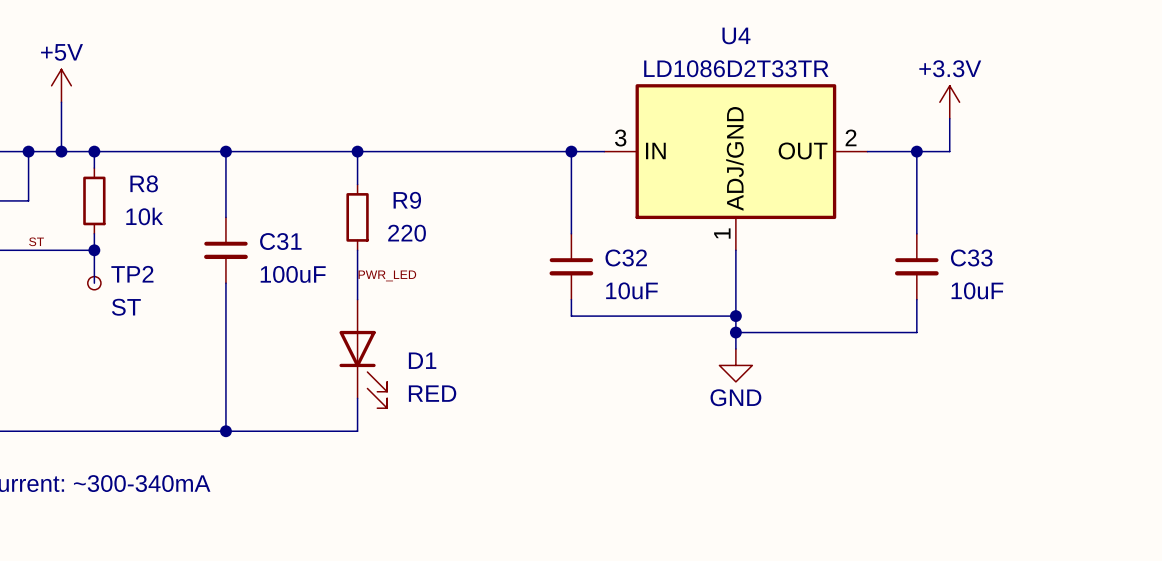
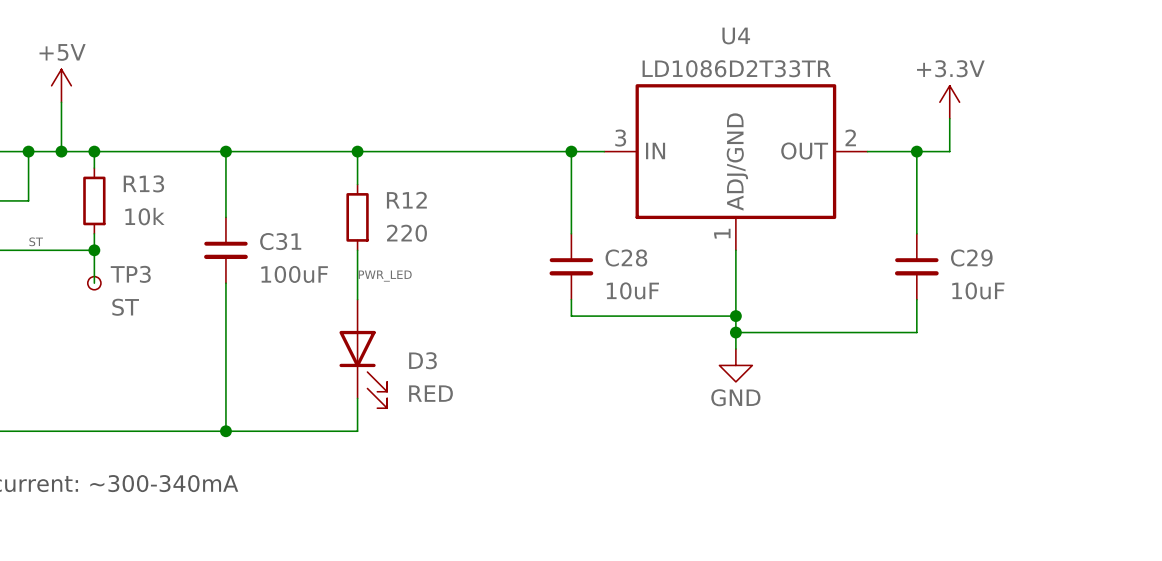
R8 name: R8 (144, 183) -> R13 (143, 183)
R9 name: R9 (407, 200) -> R12 (406, 200)
C32 name: C32 (626, 257) -> C28 (626, 258)
C33 name: C33 (971, 257) -> C29 (971, 258)
TP2 name: TP2 (132, 274) -> TP3 (130, 274)
D1 name: D1 (422, 360) -> D3 (422, 360)

